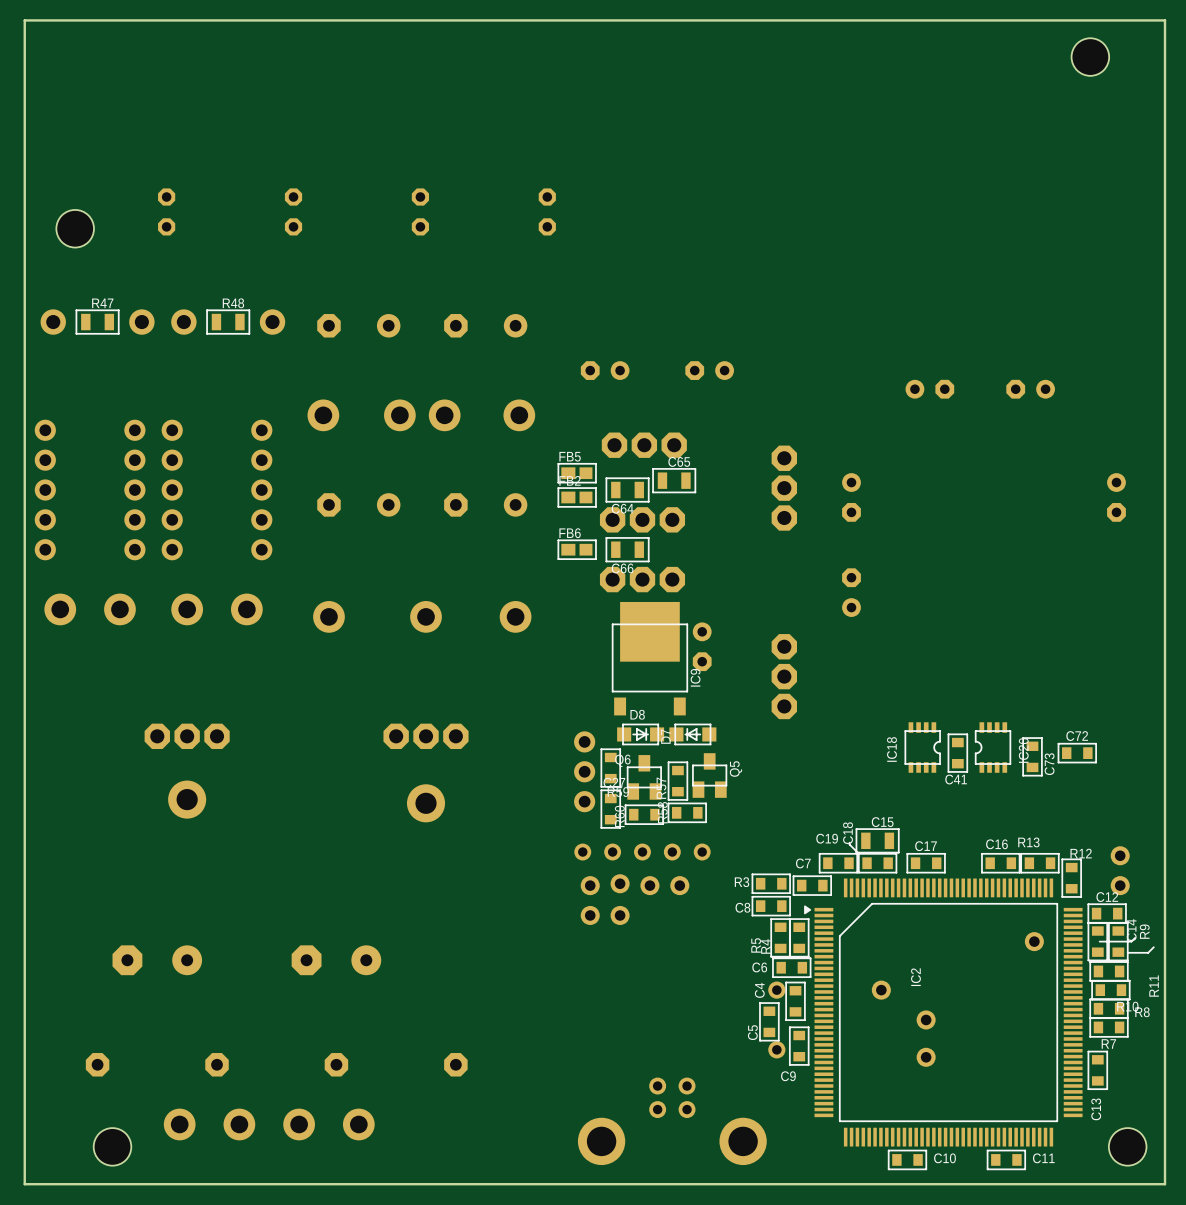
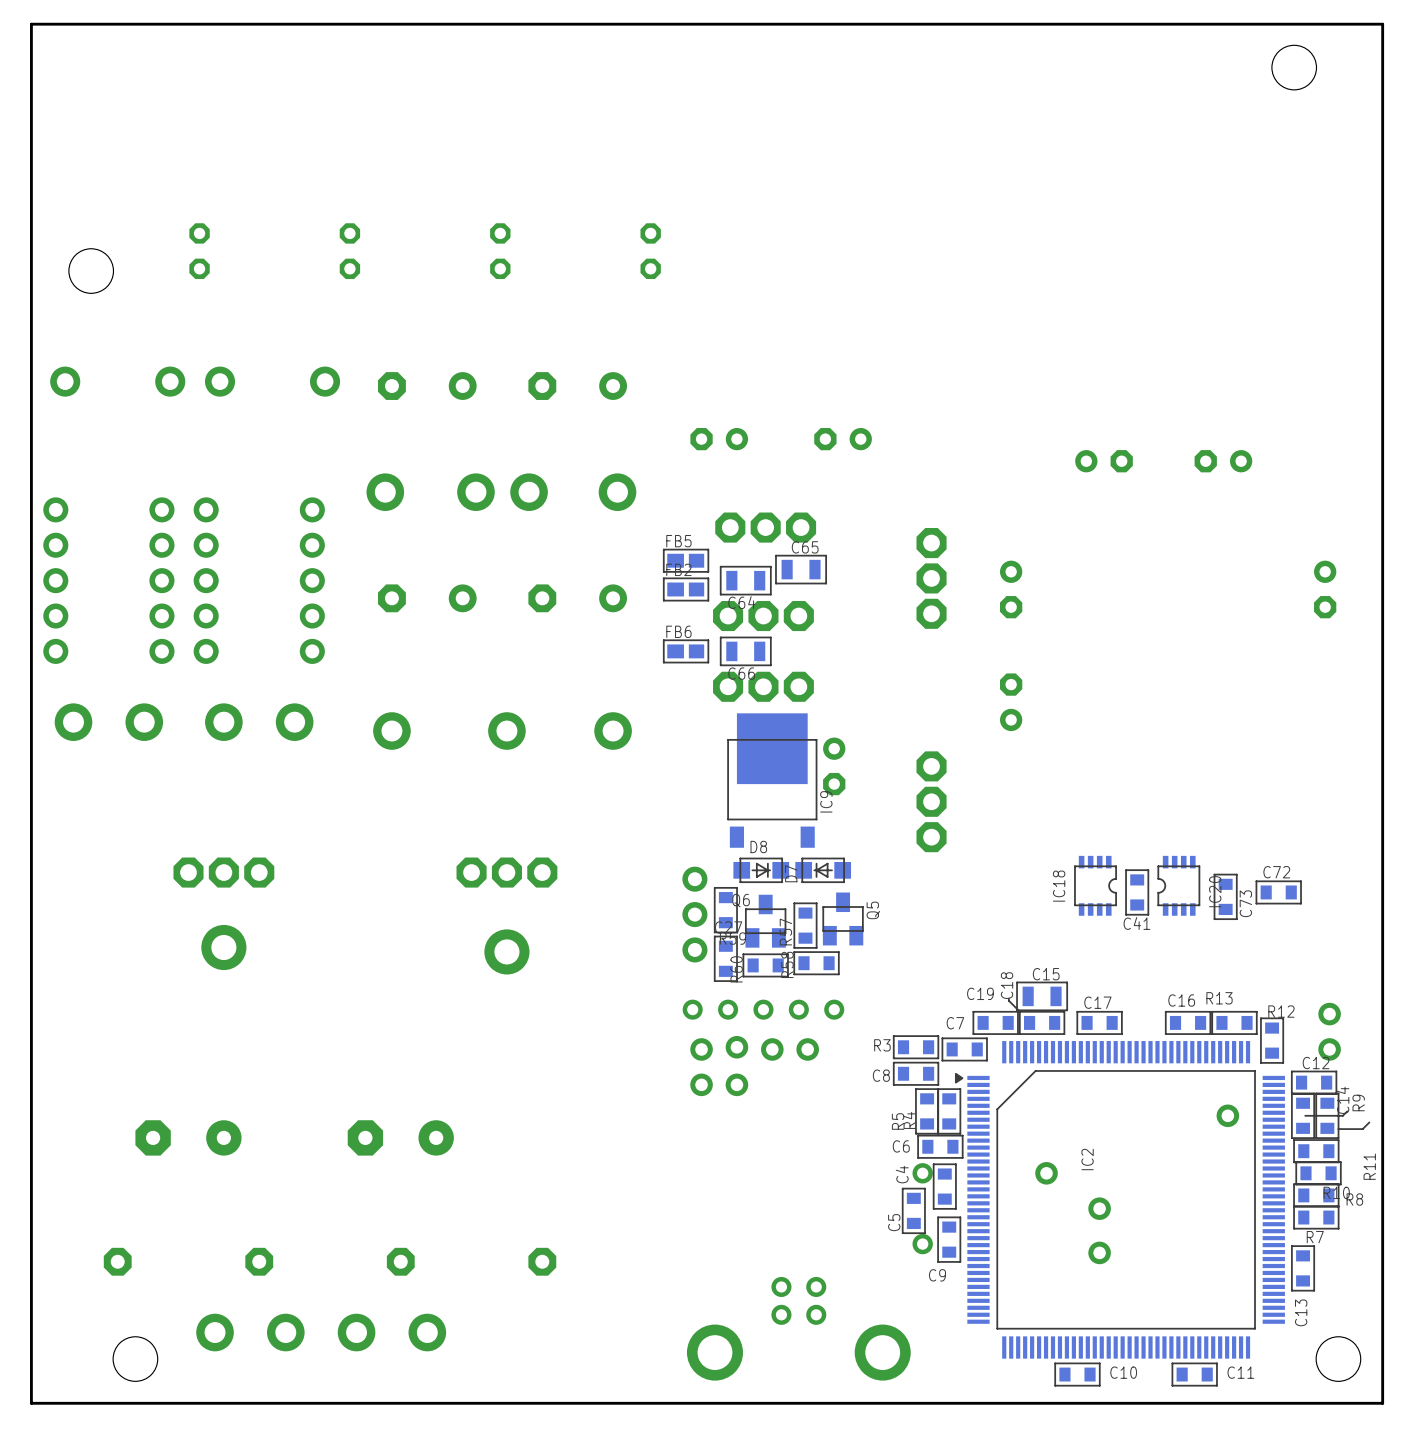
R47: (97, 322) -> none
R48: (228, 322) -> none

